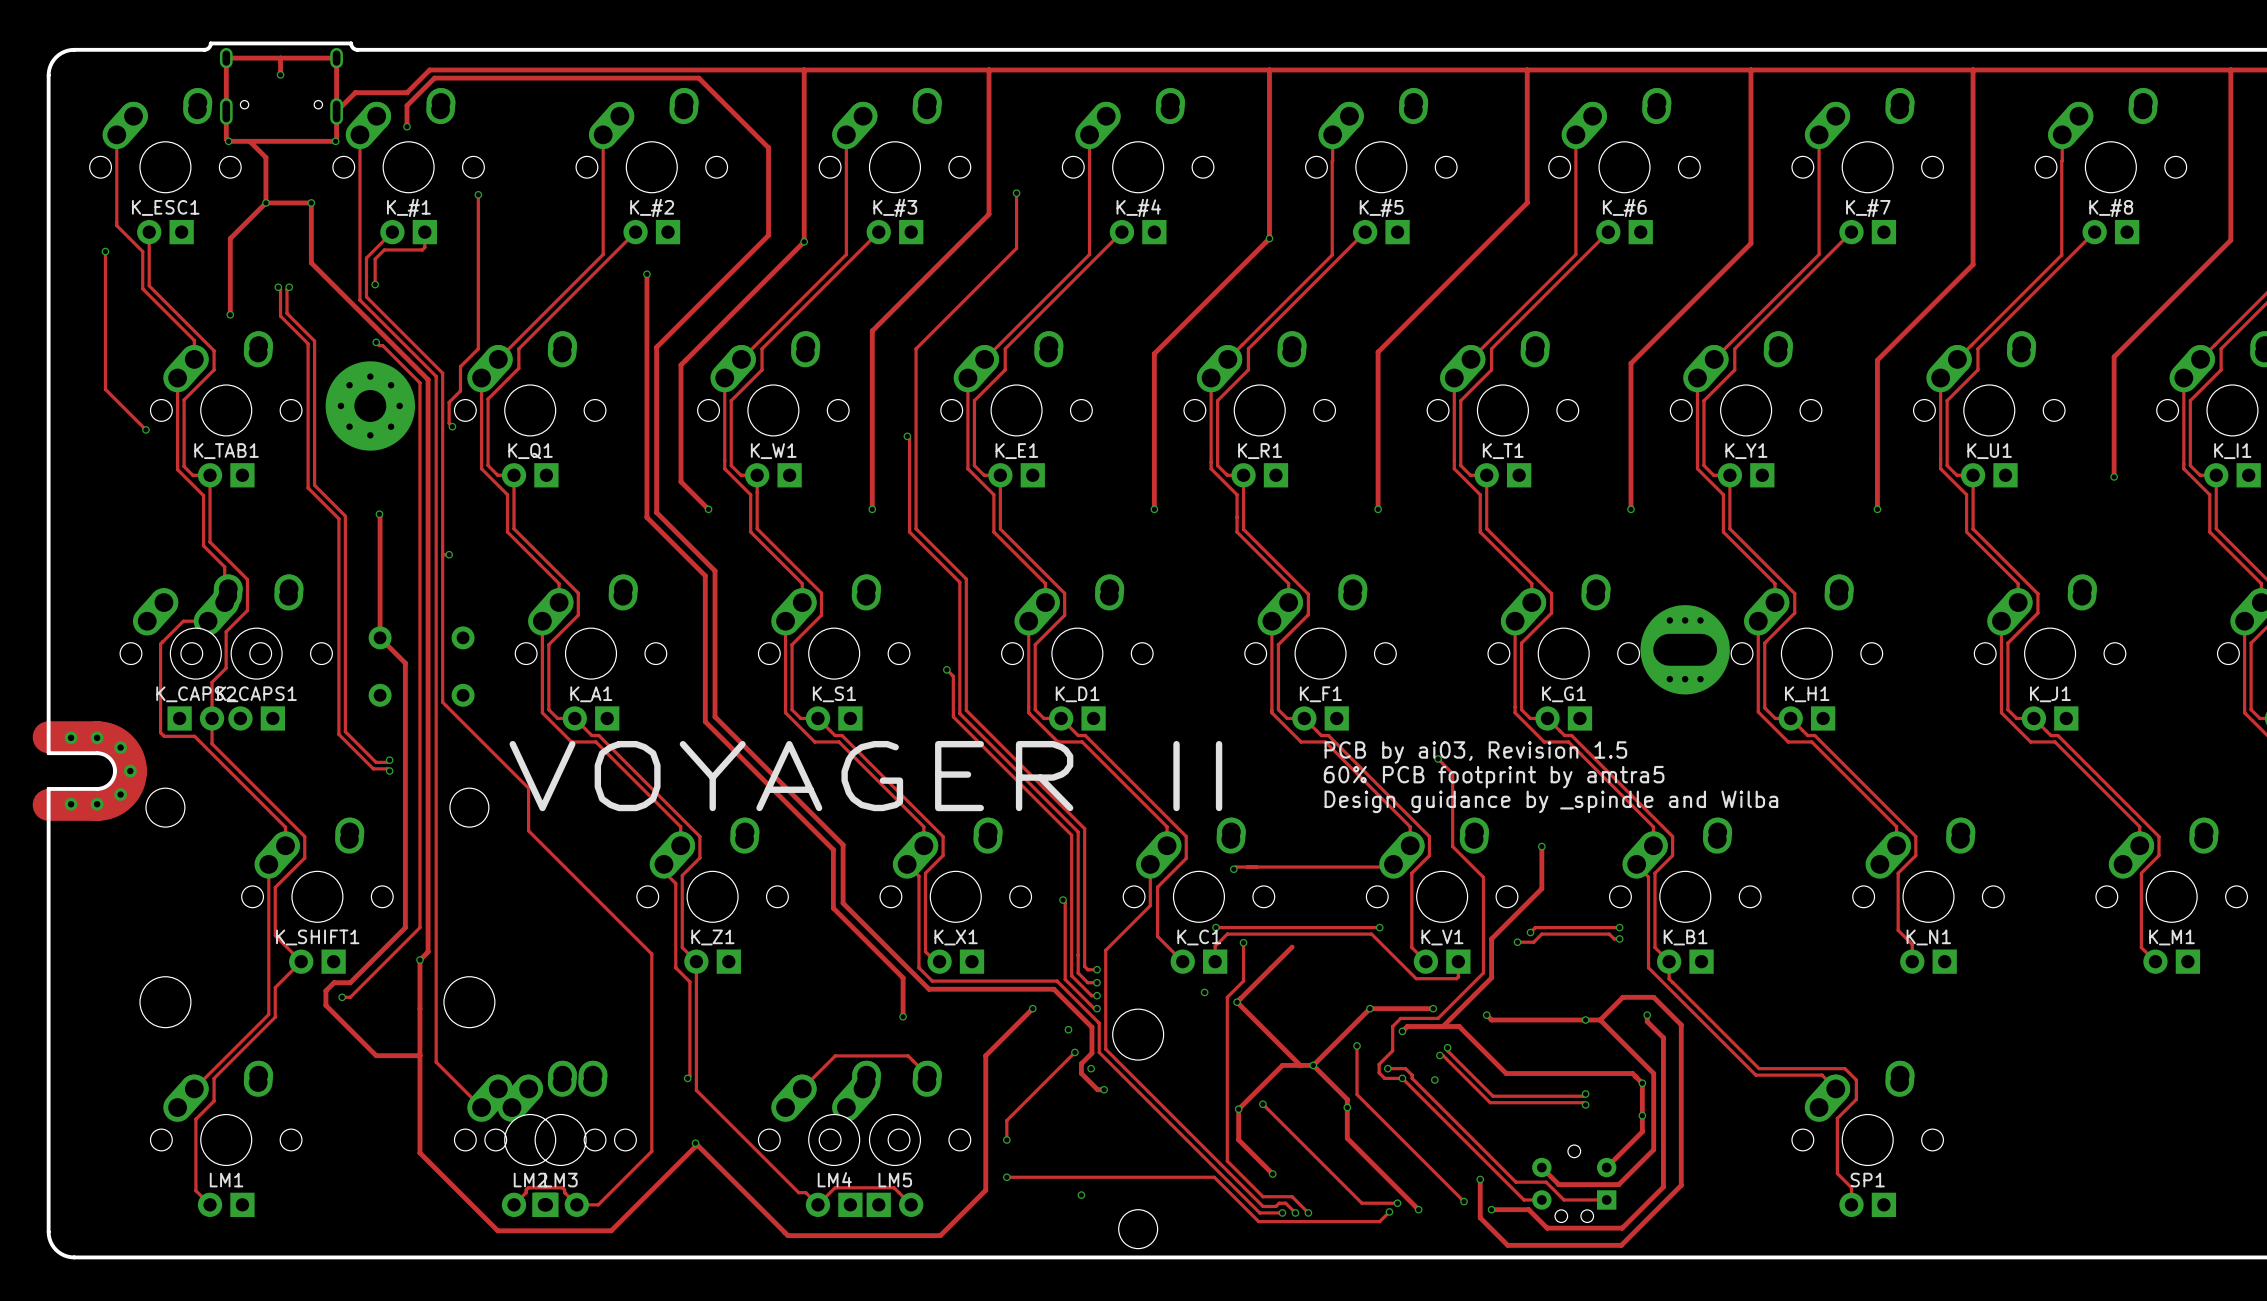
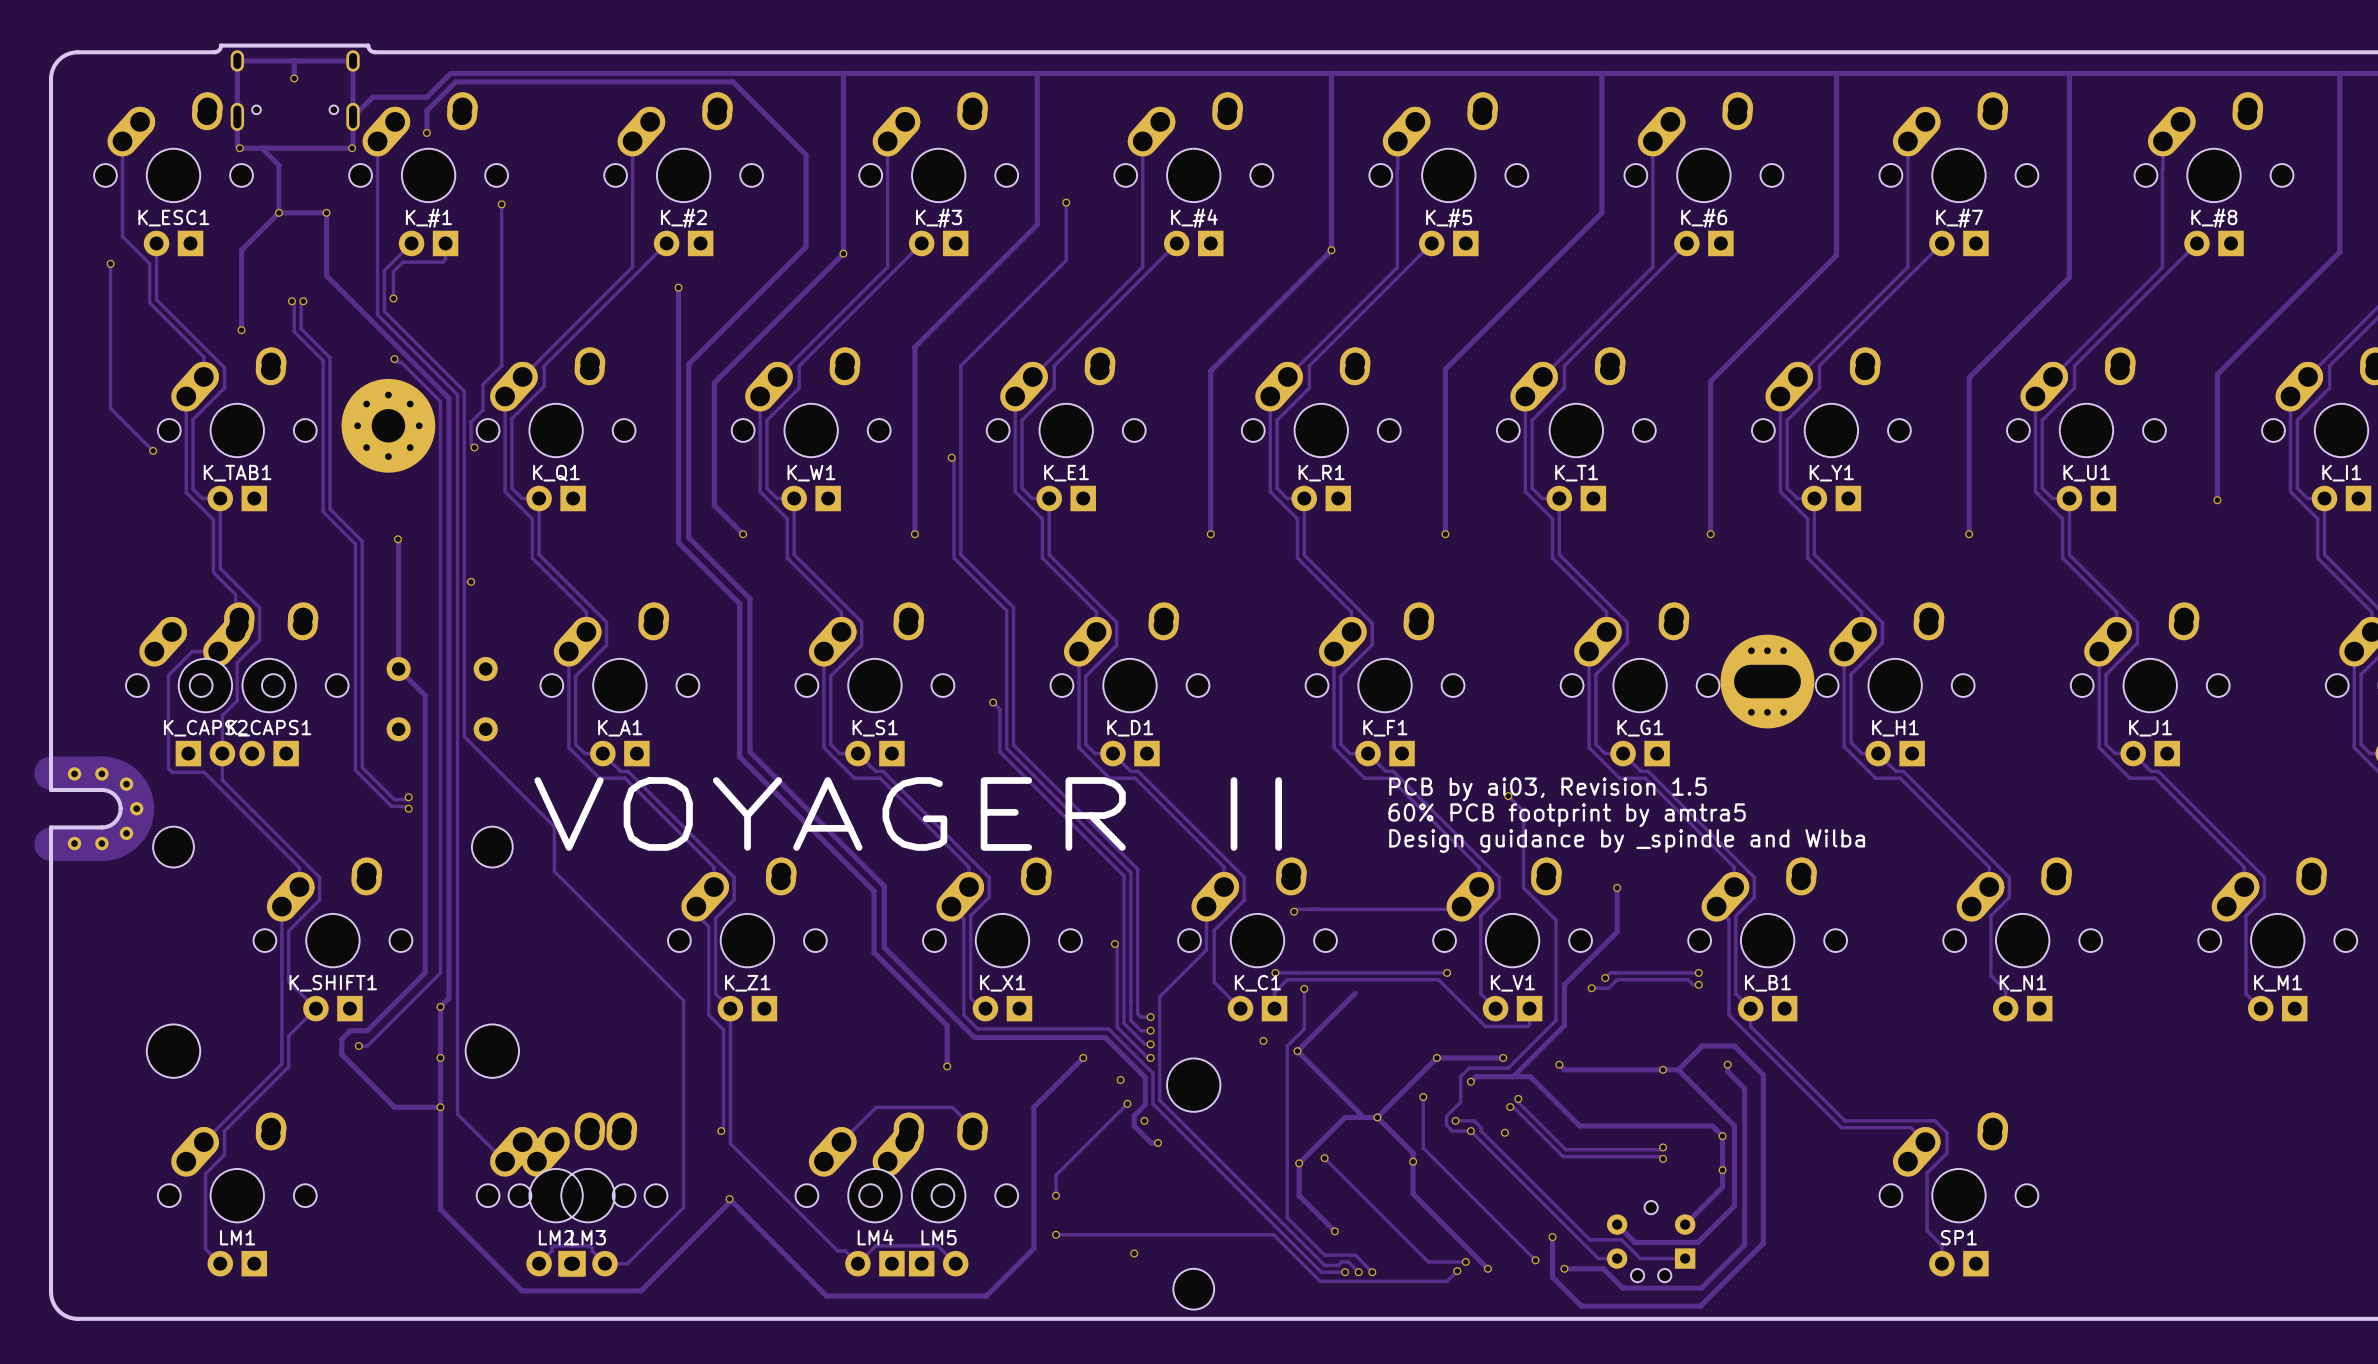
via: none -> (440, 1057)
via: none -> (440, 1107)

